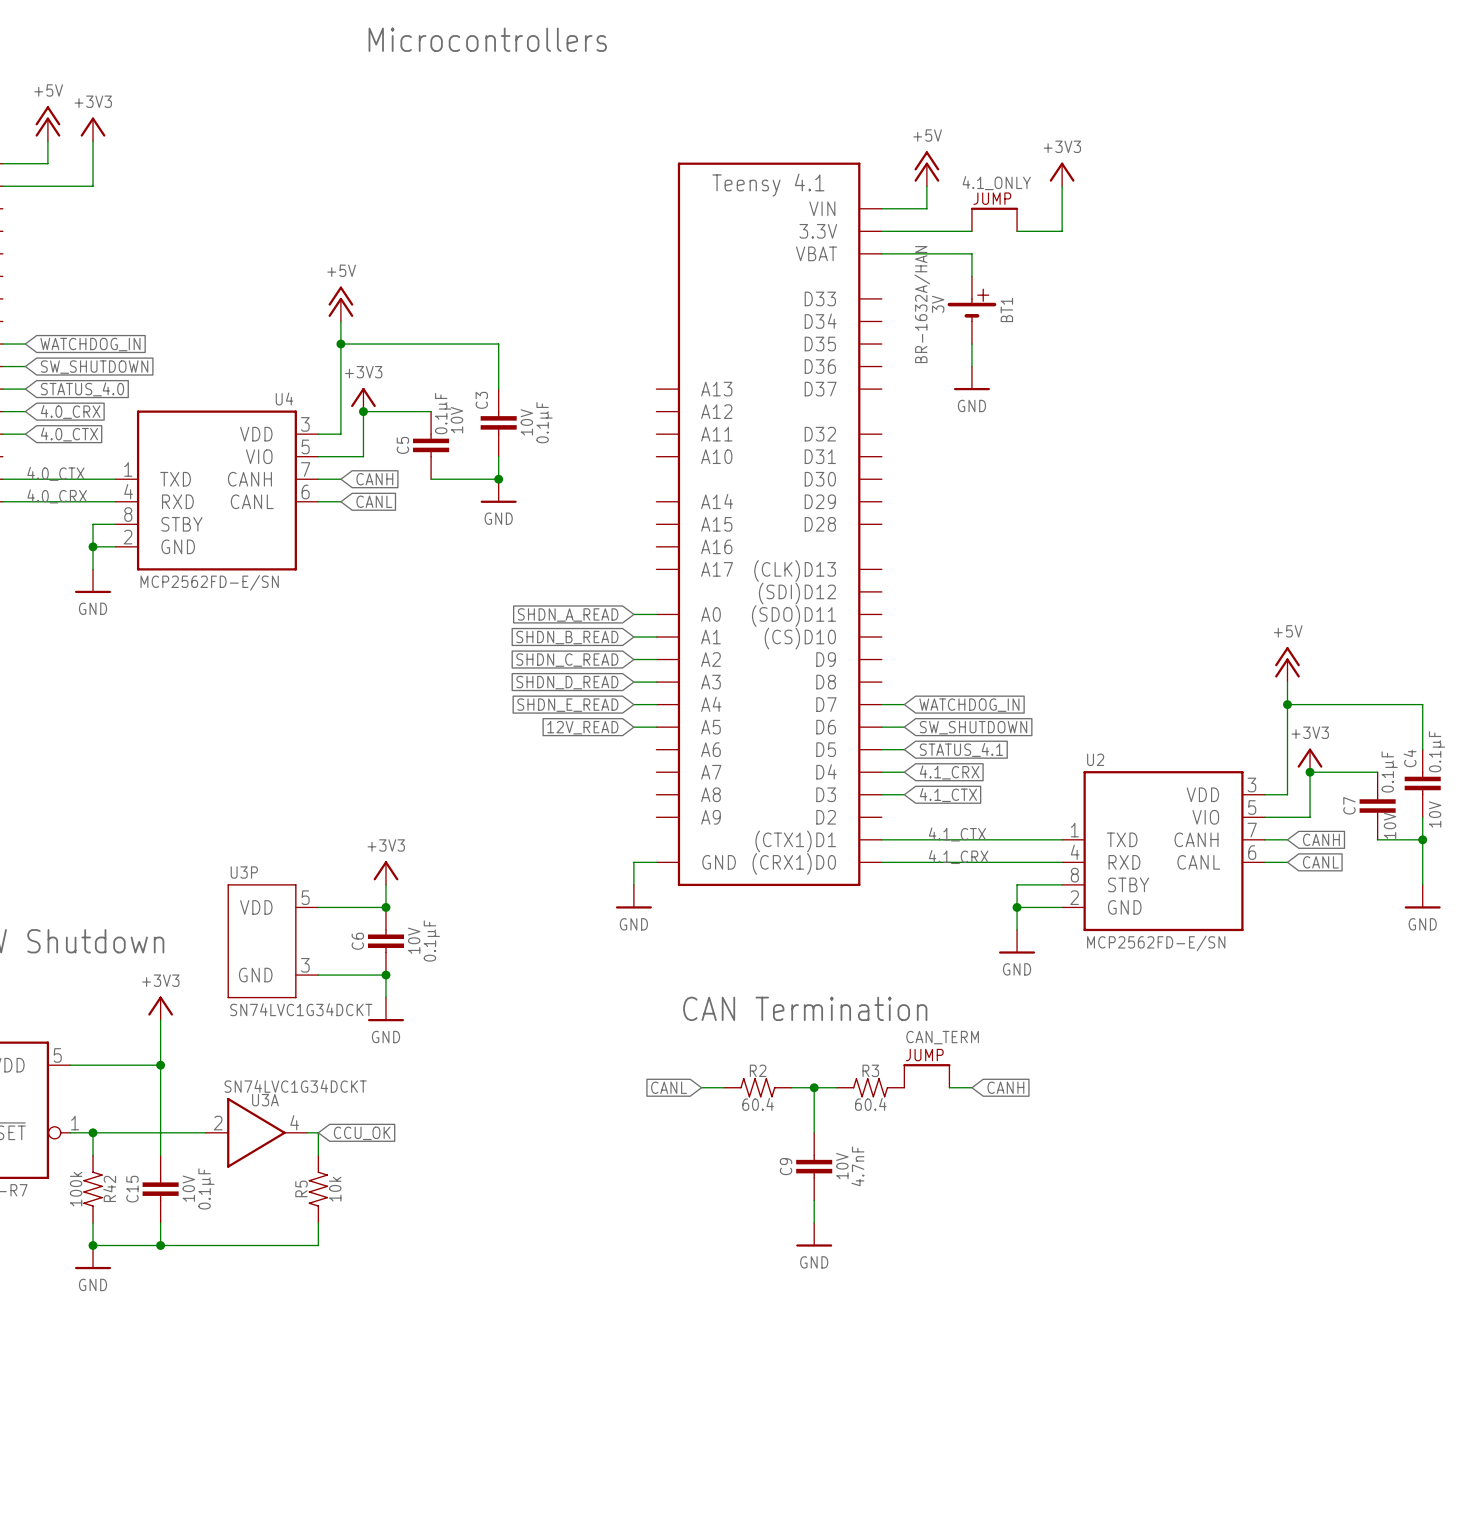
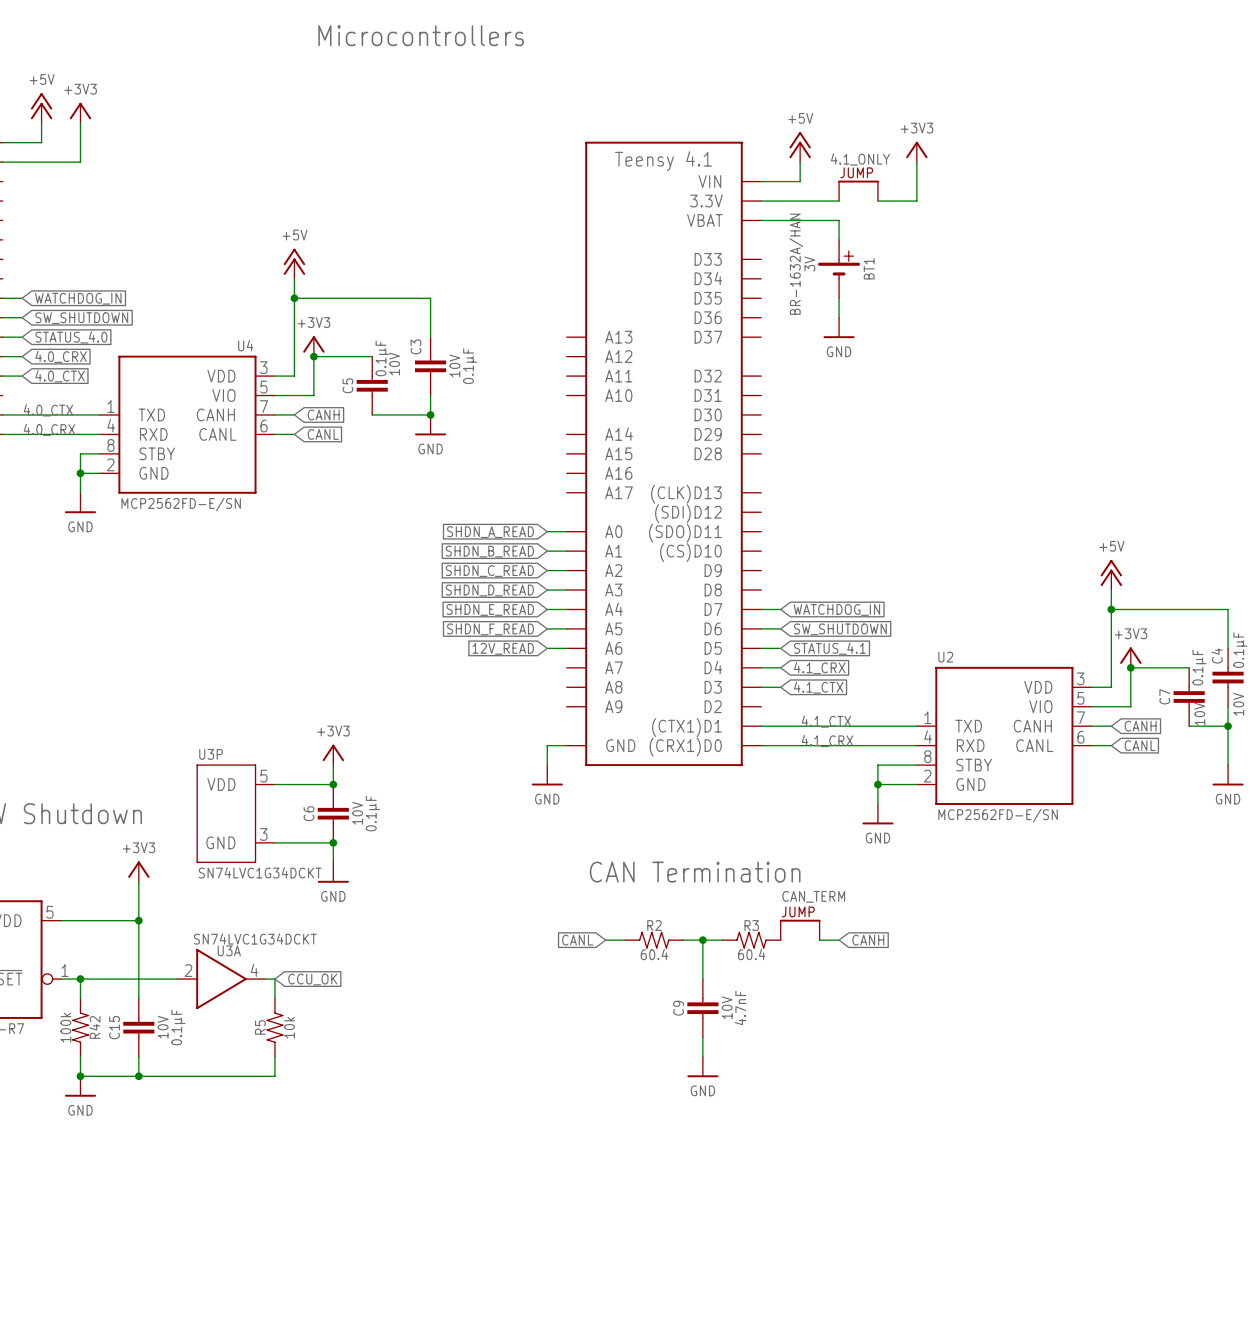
global label: 12V_READ (582, 727) -> SHDN_F_READ (490, 629)
wire: none -> (547, 648) (566, 648)
global label: none -> 12V_READ (503, 648)

